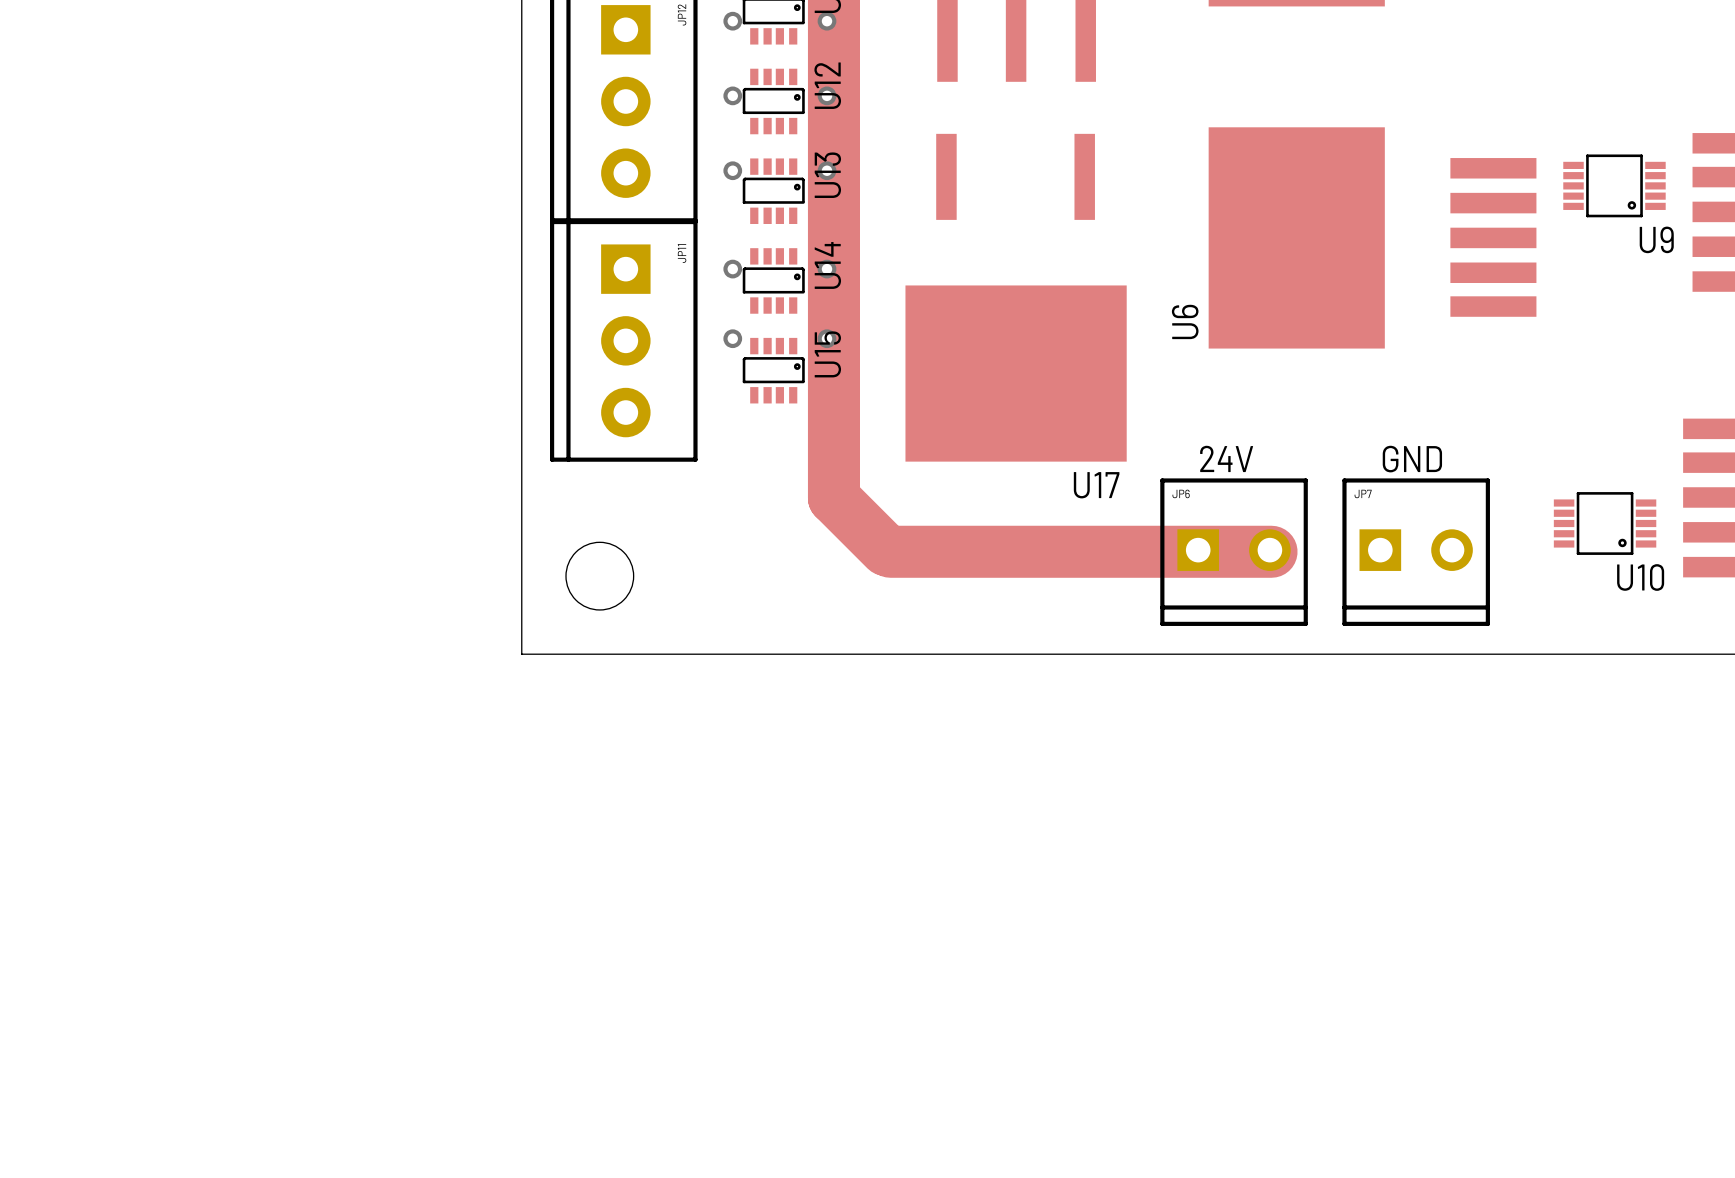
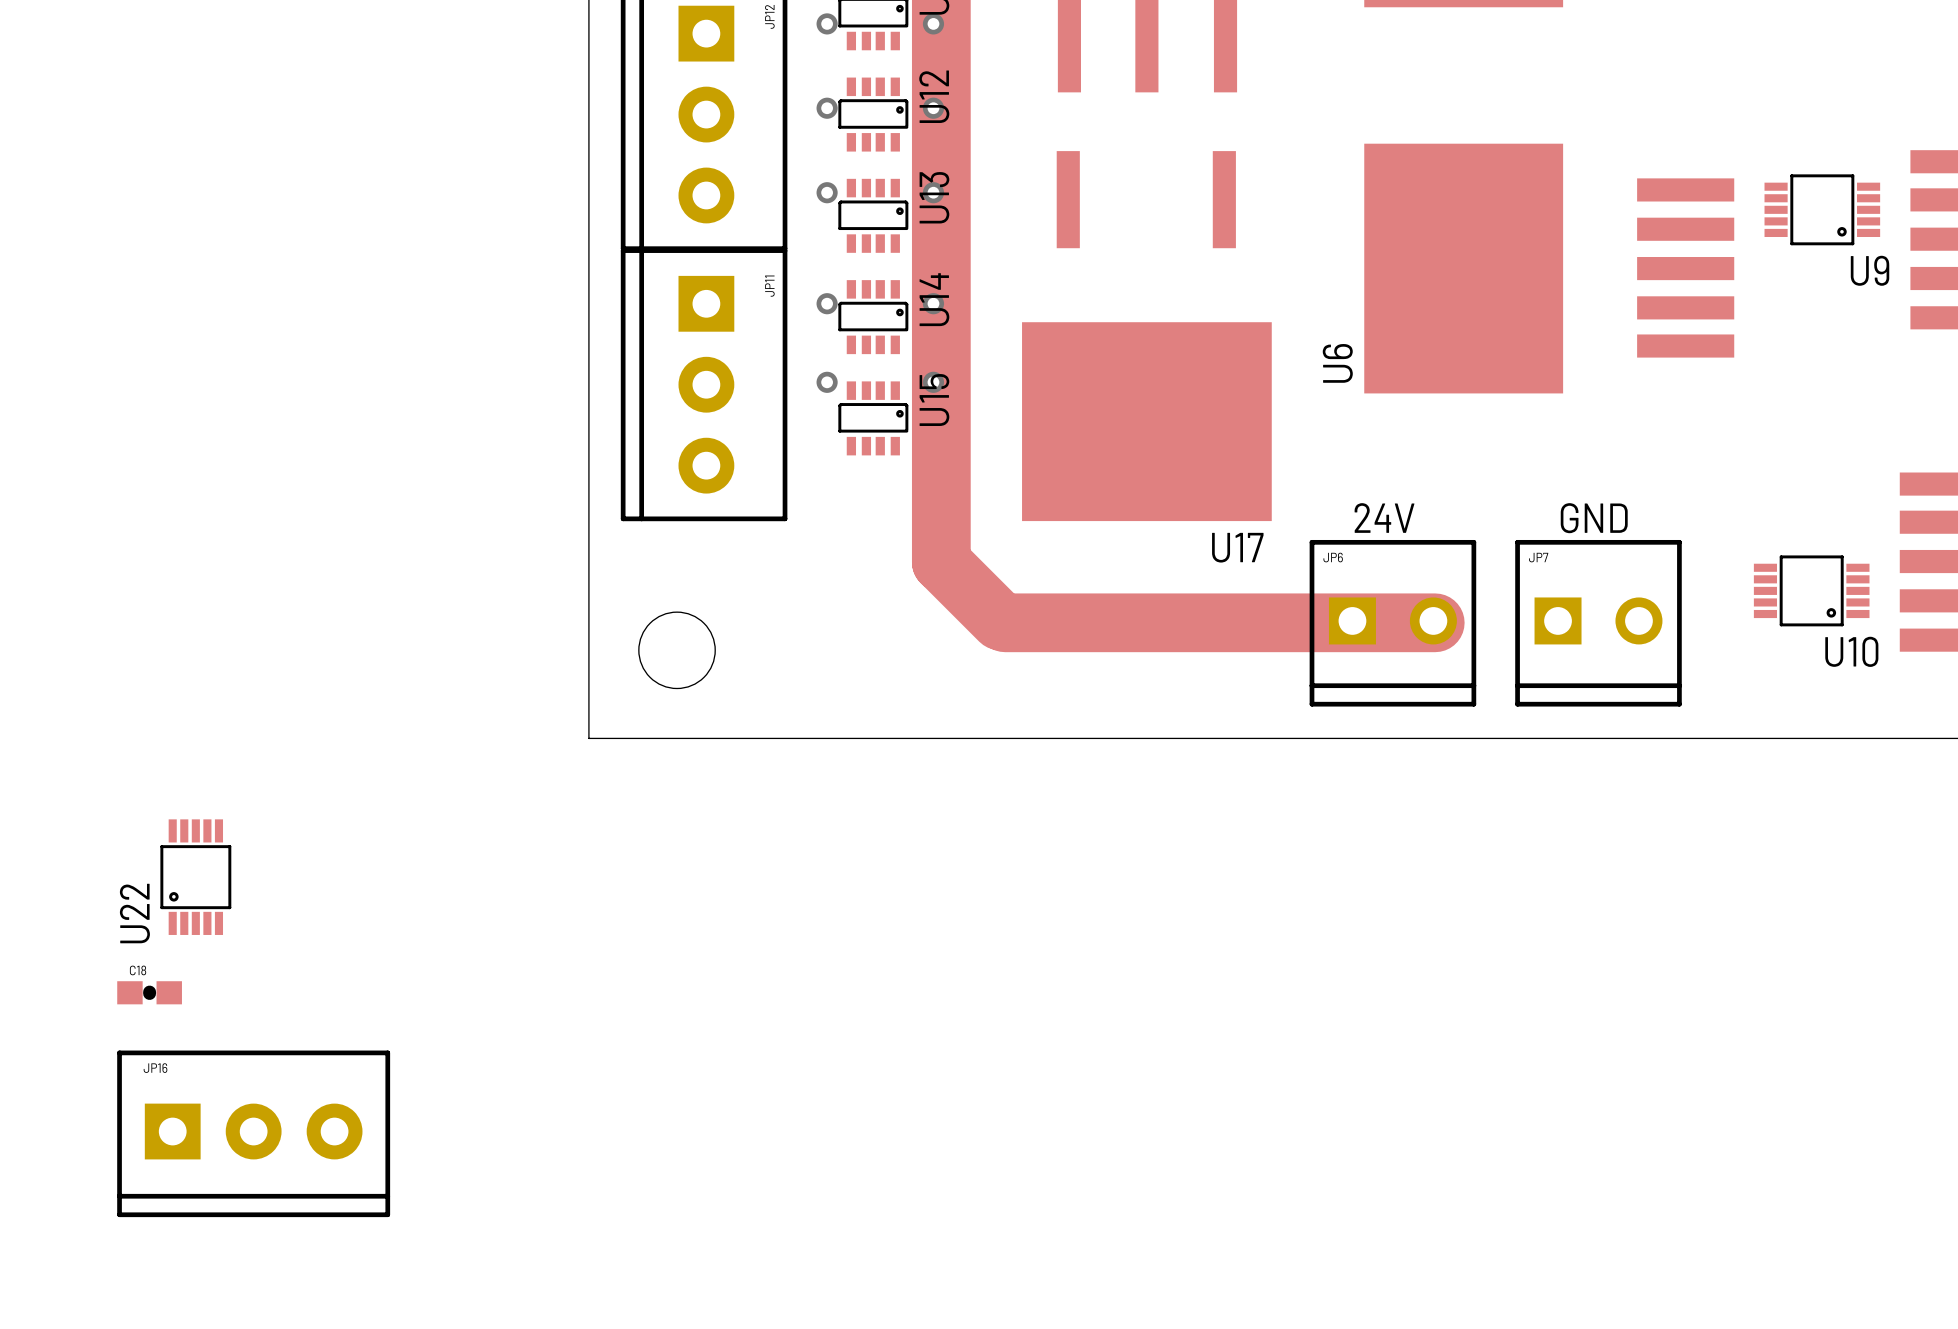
U22: none -> (195, 877)
C18: none -> (149, 992)
JP16: none -> (253, 1133)

